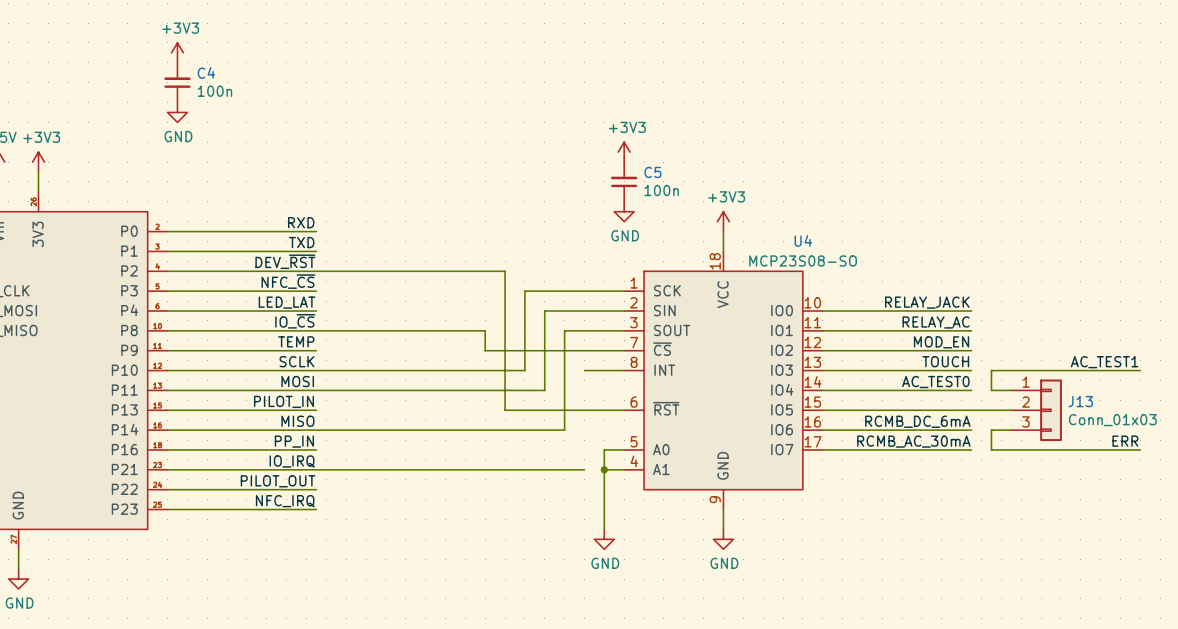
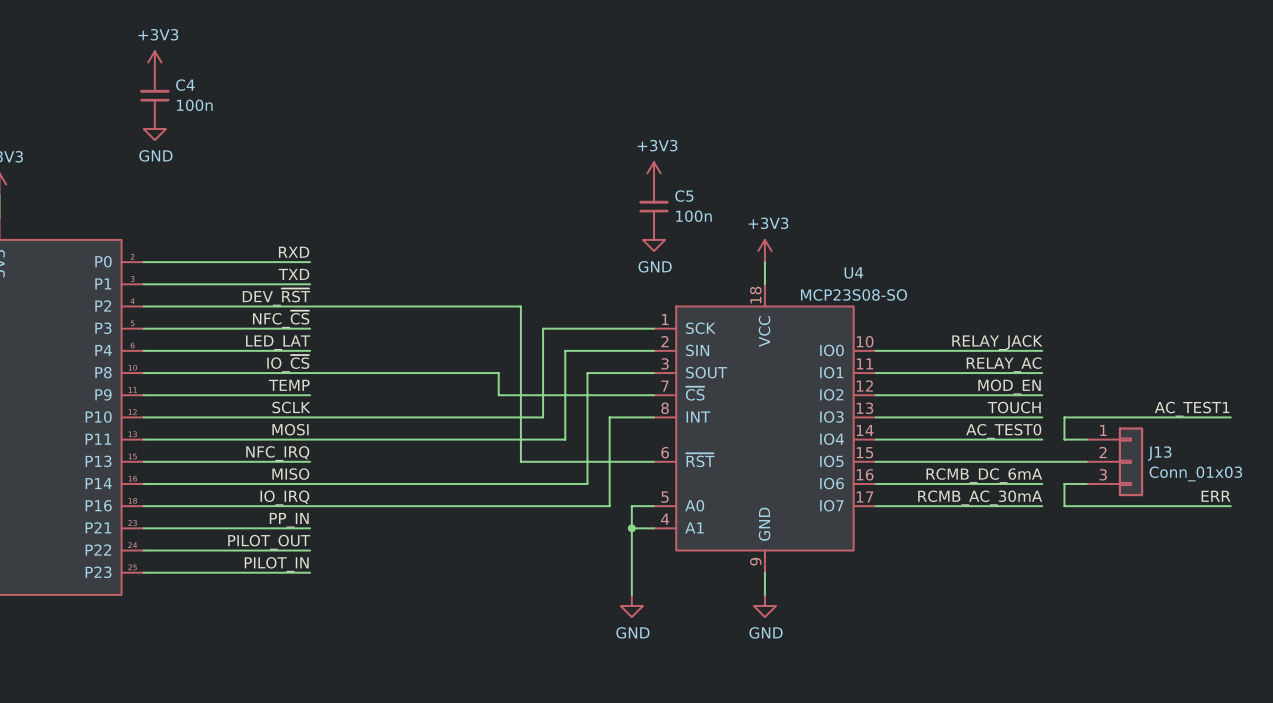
wire: none -> (609, 417) (609, 506) (310, 506)
label: PILOT_IN (283, 401) -> NFC_IRQ (277, 453)
label: PP_IN (294, 441) -> IO_IRQ (284, 497)
label: IO_IRQ (292, 461) -> PP_IN (289, 520)
wire: (316, 469) (584, 469) -> none
label: NFC_IRQ (285, 501) -> PILOT_IN (276, 564)

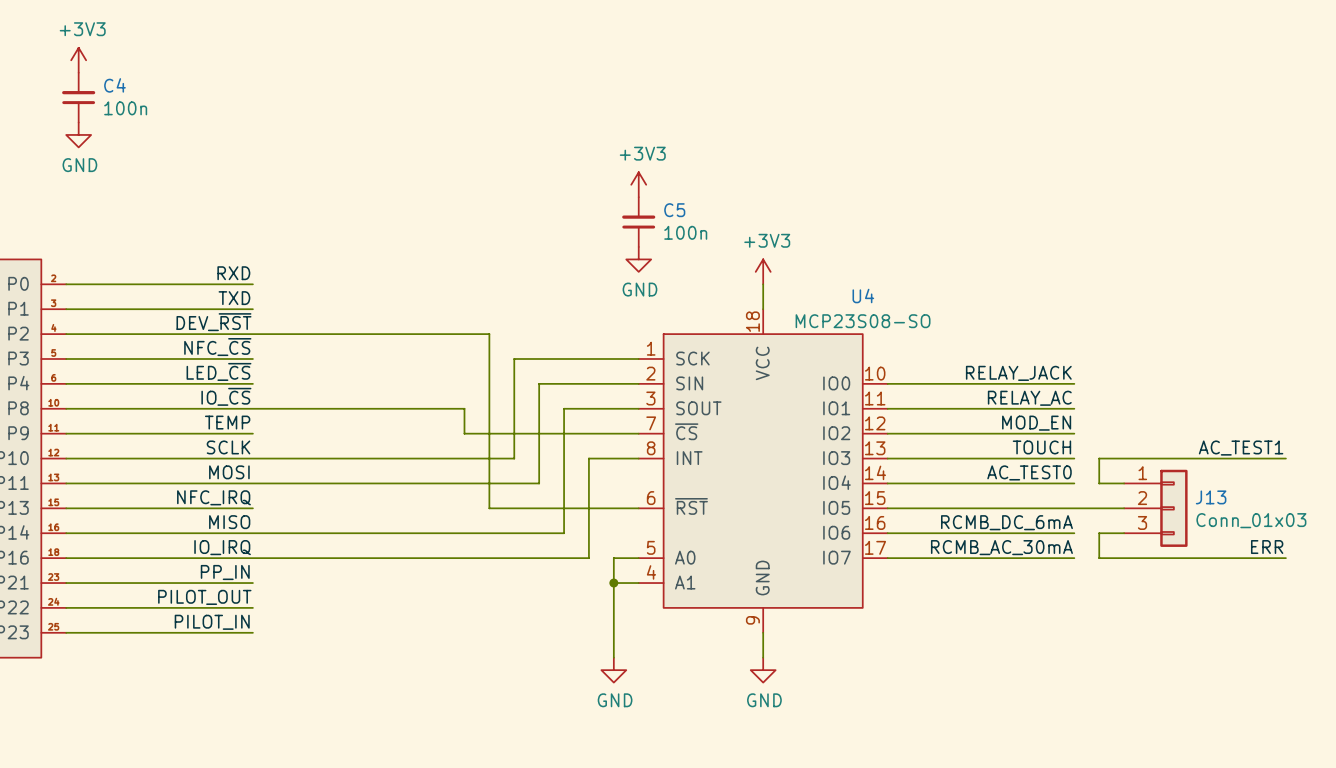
label: LED_LAT (278, 342) -> LED_~{CS} (219, 371)

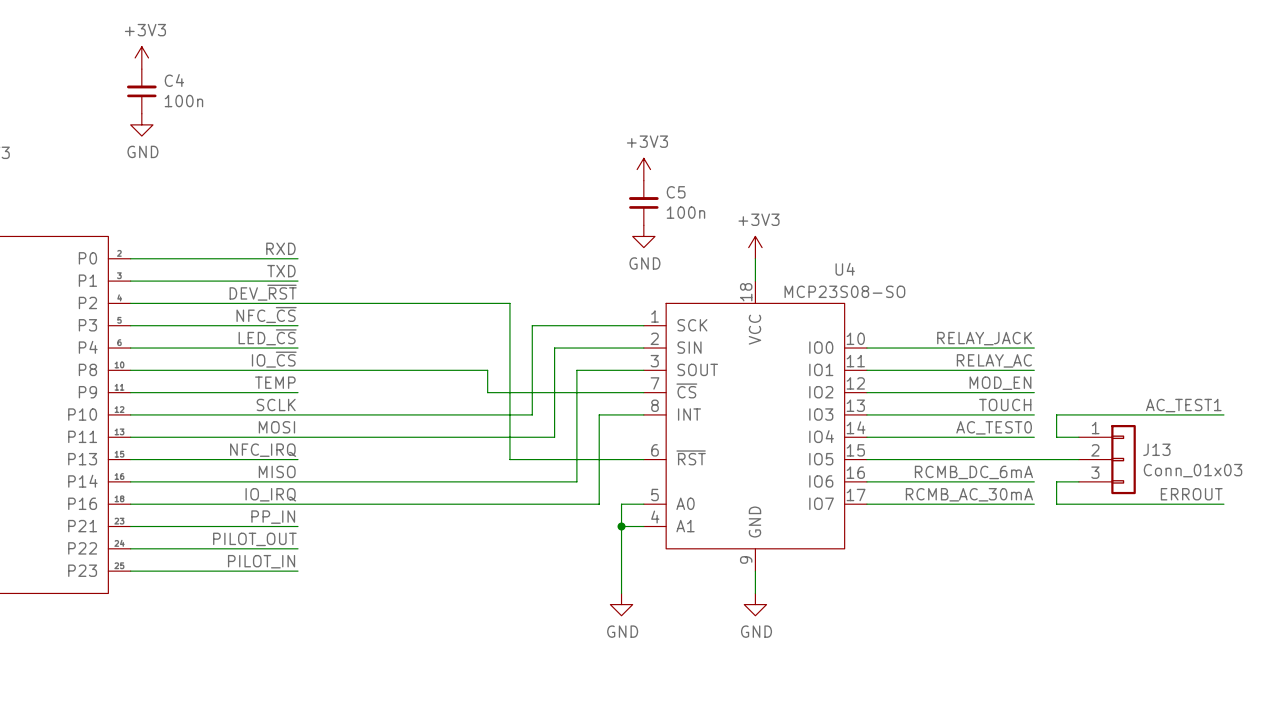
label: ERR (1267, 547) -> ERROUT (1191, 494)

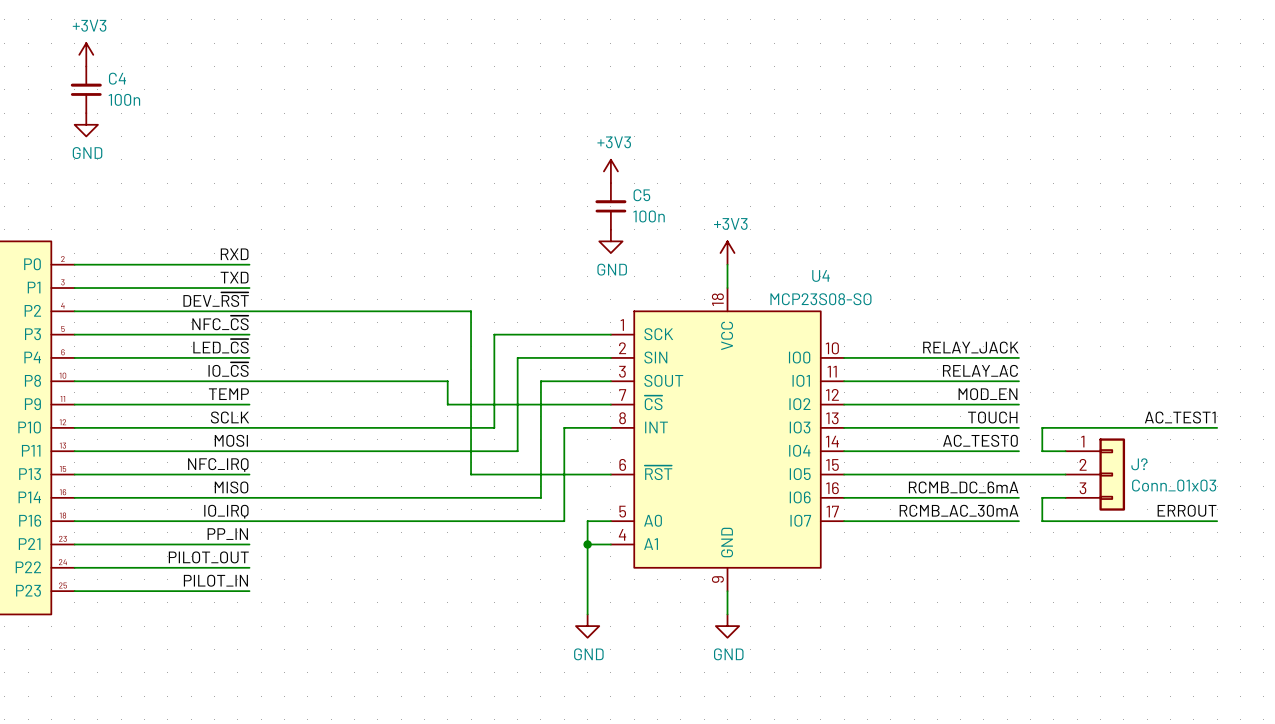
J13 name: J13 (1156, 449) -> J? (1139, 464)

